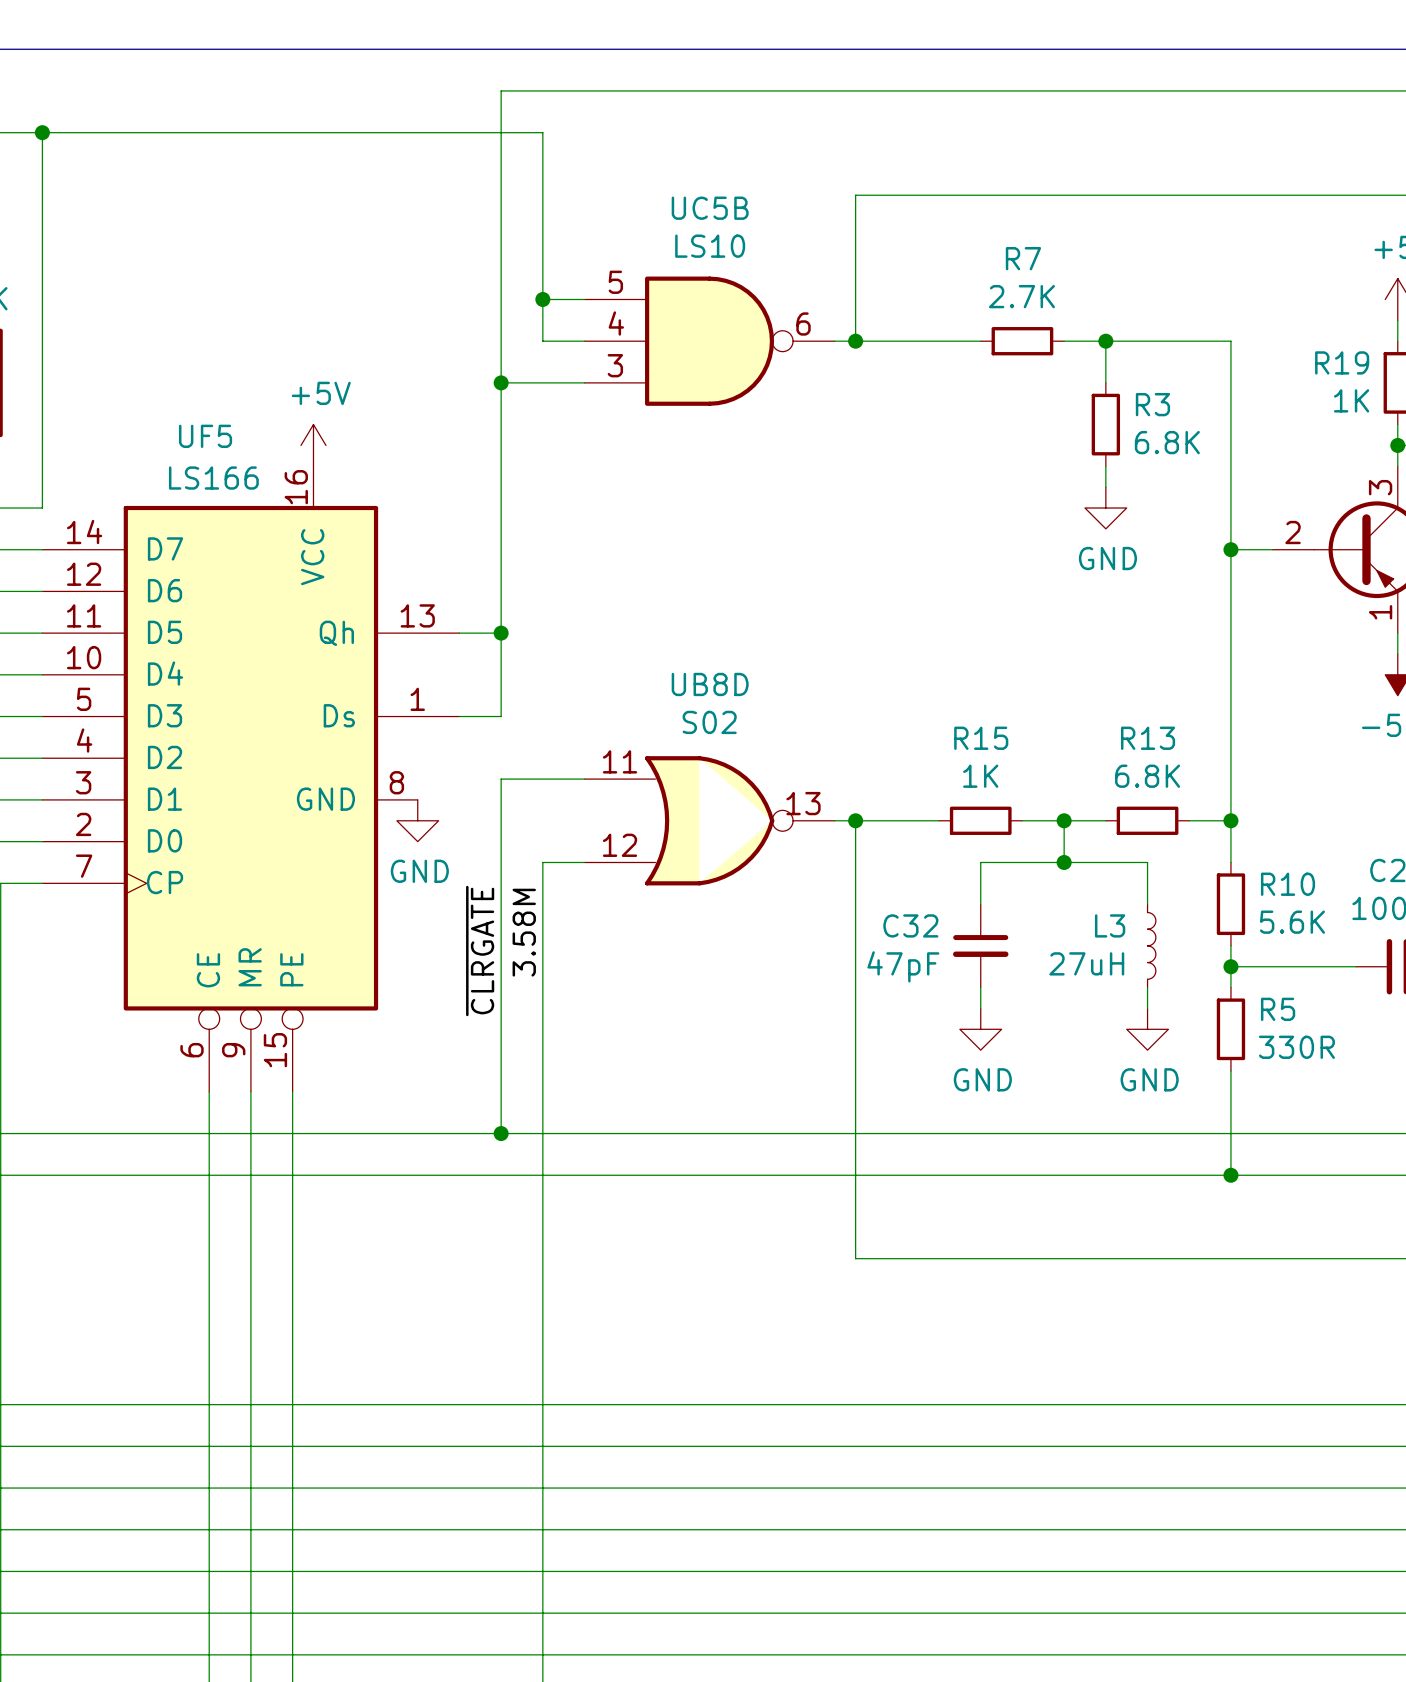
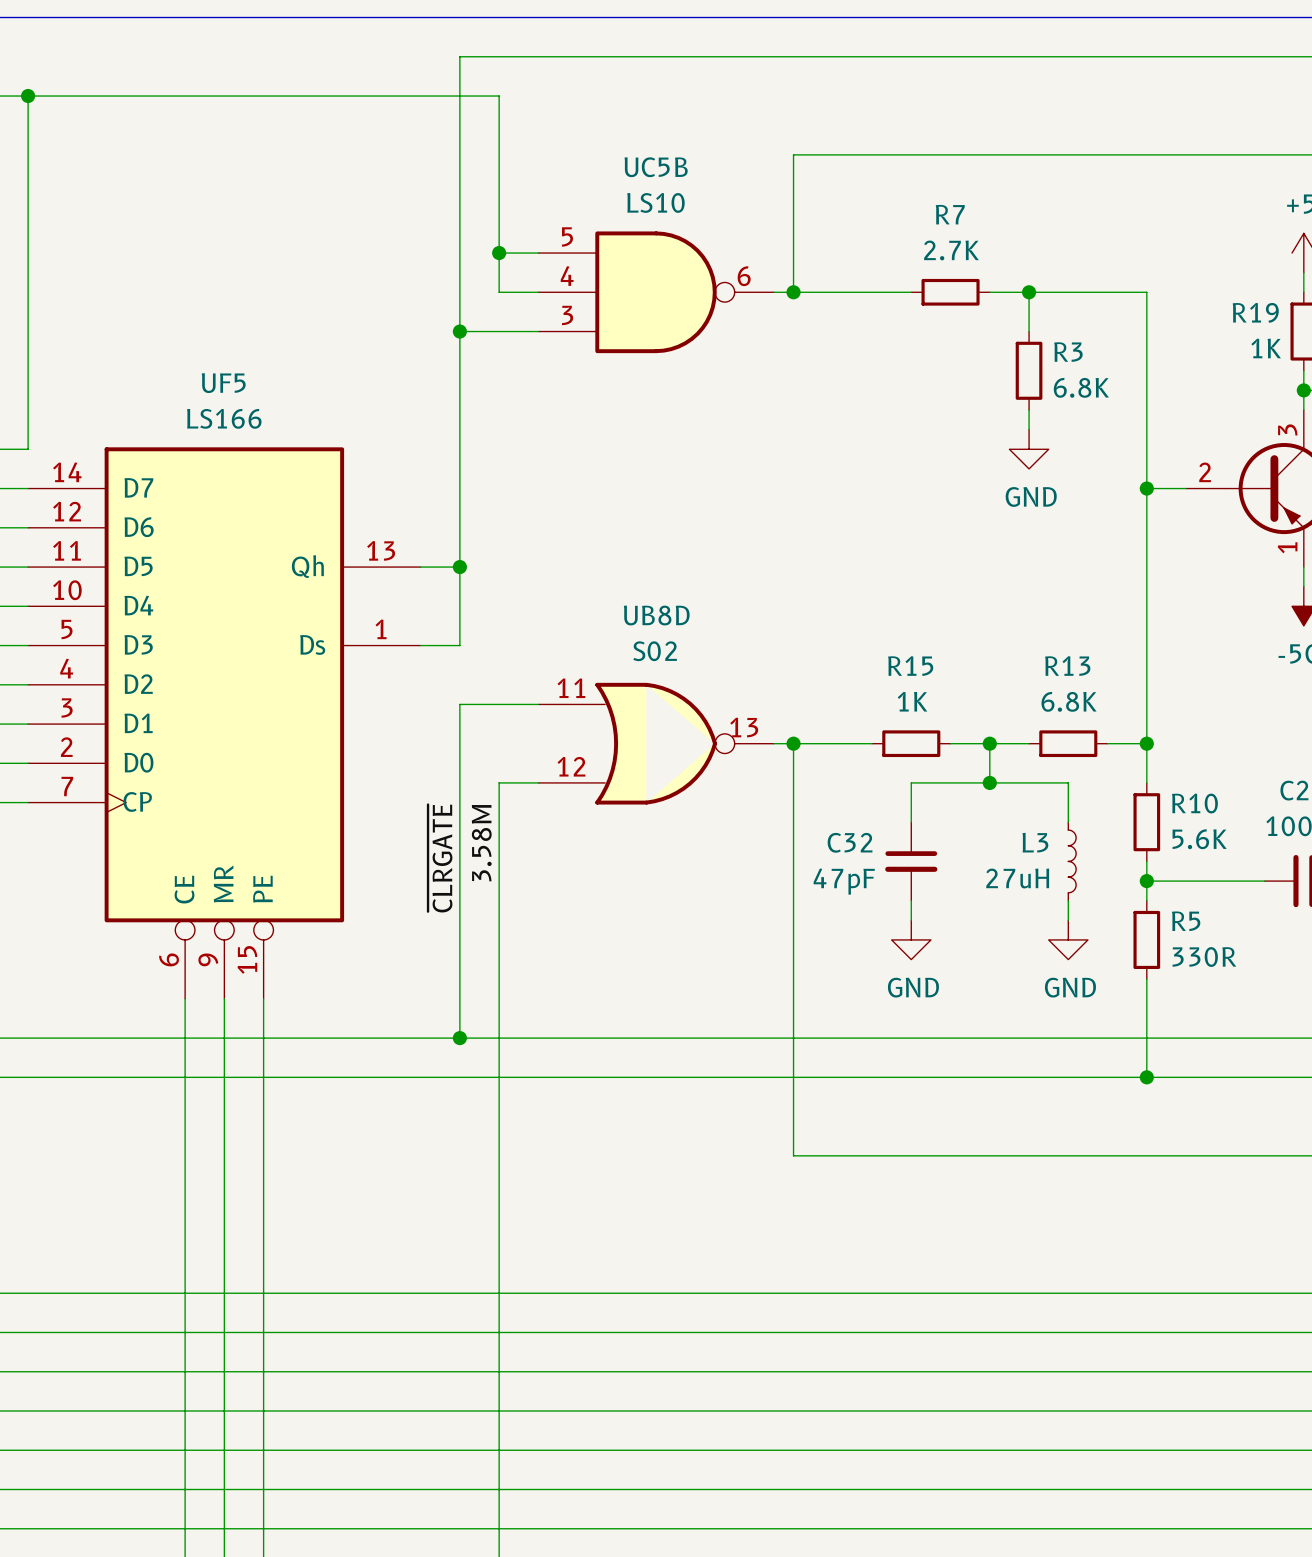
UF5 name position: UF5 (205, 436) -> UF5 (223, 383)
power symbol: +5V (313, 445) -> none
UF5 symbol: [42, 466, 460, 1092] -> [28, 447, 421, 999]
UF5 value position: LS166 (213, 478) -> LS166 (224, 418)
power symbol: GND (417, 820) -> none

